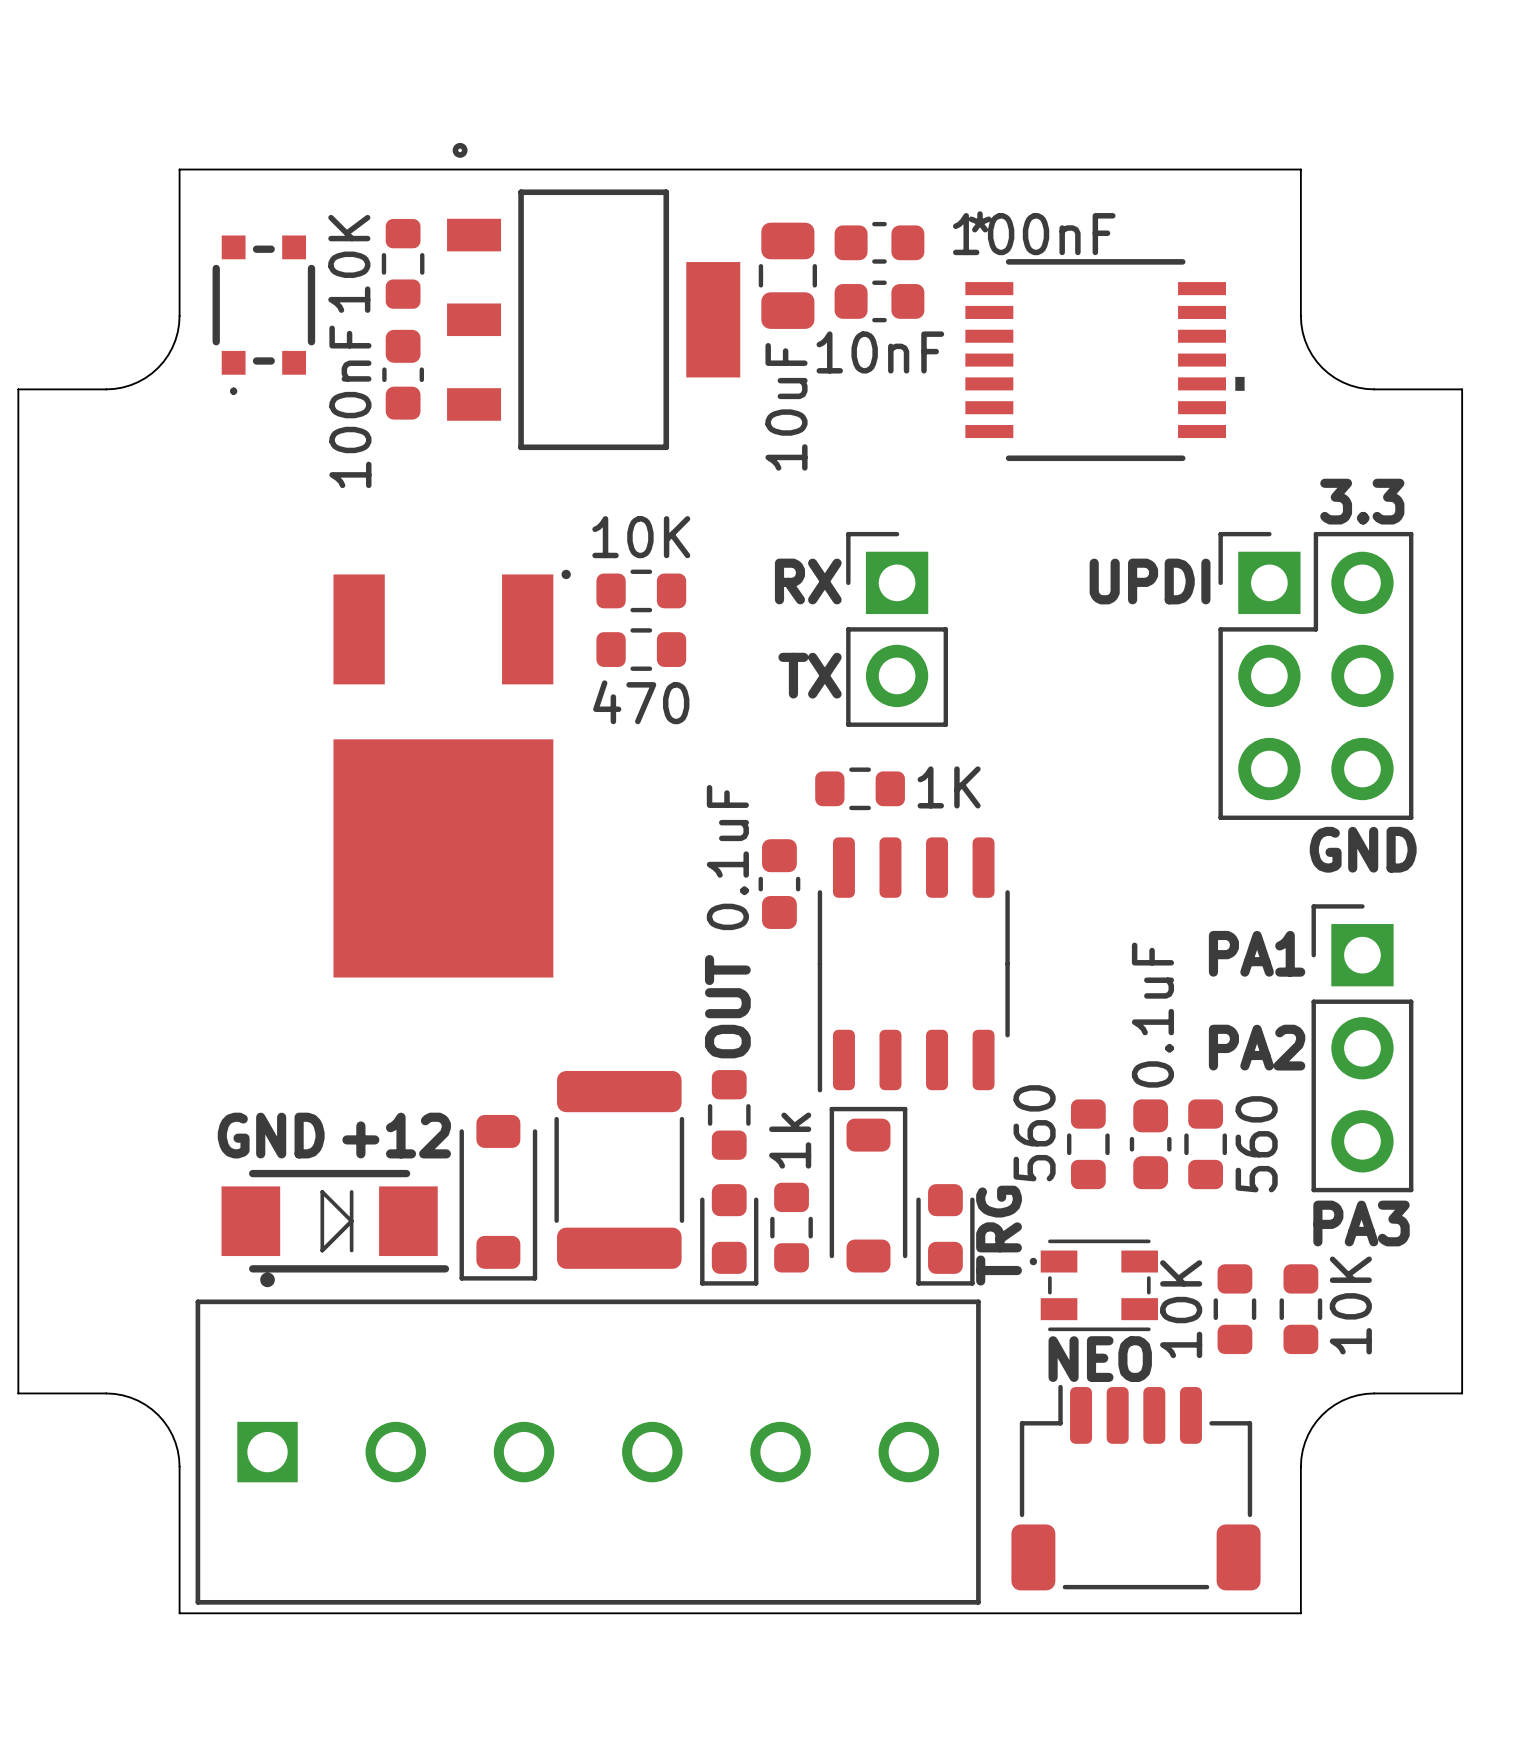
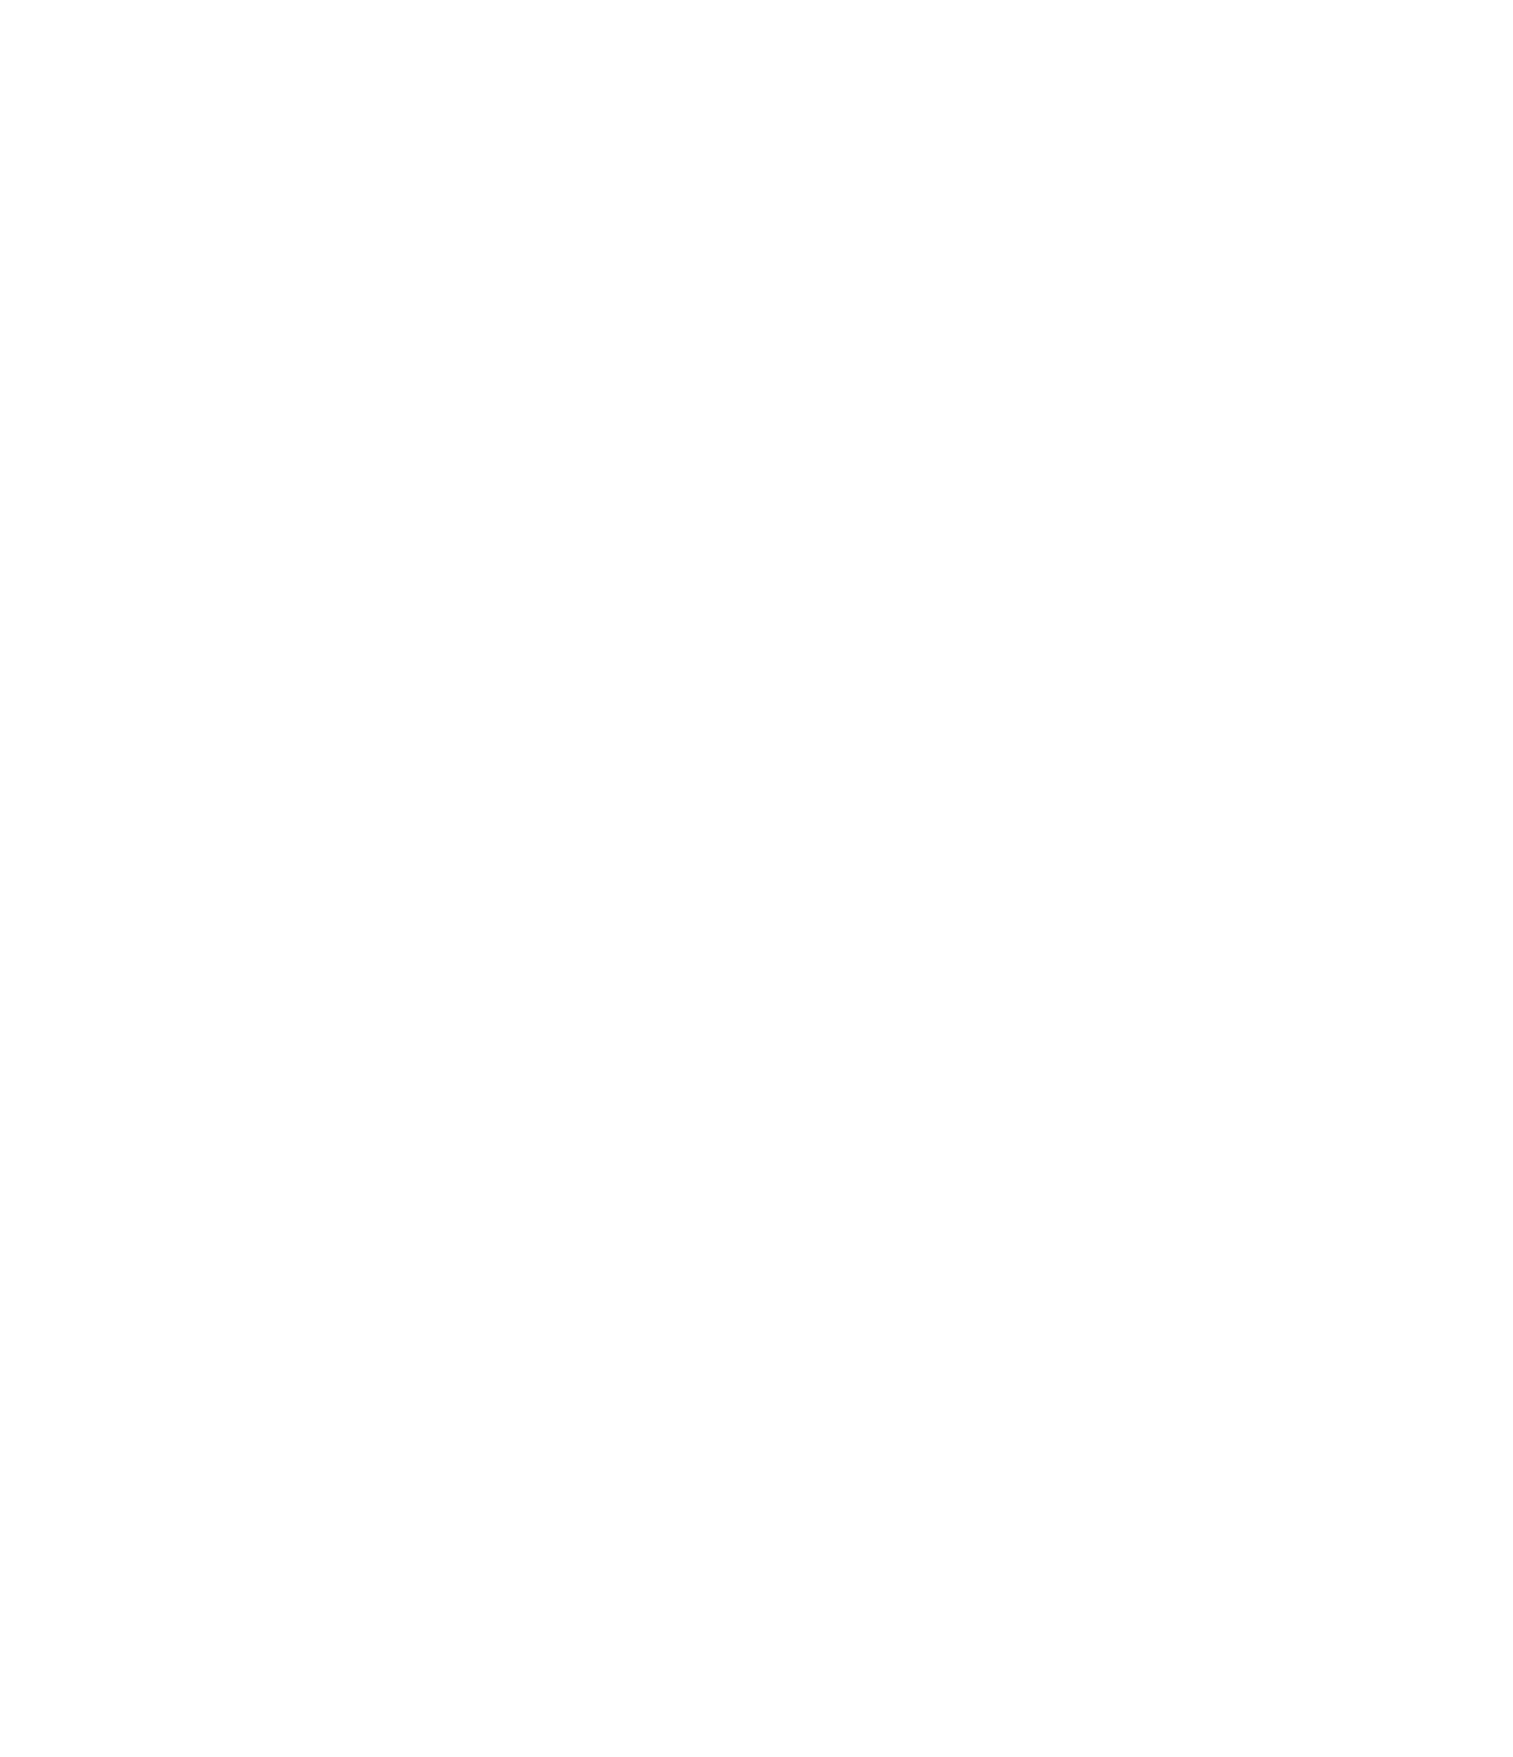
board edge: (179, 169) (1300, 169) (1301, 324) (1308, 347) (1316, 361) (1335, 378) (1357, 387) (1374, 389) (1462, 389) (1462, 1393) (1374, 1393) (1357, 1395) (1335, 1404) (1316, 1421) (1308, 1434) (1301, 1458) (1300, 1613) (179, 1613) (179, 1458) (175, 1442) (163, 1421) (145, 1404) (122, 1395) (106, 1393) (18, 1393) (18, 389) (106, 389) (122, 387) (145, 378) (163, 361) (175, 340) (179, 324) (179, 169) -> none
part: 100nF (879, 242) -> none
part: 10K (403, 263) -> none
part: 10uF (787, 275) -> none
part: (593, 296) -> none
part: 10nF (879, 301) -> none
part: (263, 315) -> none
part: (1104, 360) -> none
part: 100nF (403, 374) -> none
text: 3.3 (1362, 501) -> none
text: RX (808, 581) -> none
text: UPDI (1150, 581) -> none
part: 10K (641, 590) -> none
part: (897, 629) -> none
part: 470 (641, 649) -> none
text: TX (810, 675) -> none
part: (1315, 675) -> none
part: (452, 773) -> none
part: 1K (860, 788) -> none
text: GND (1363, 849) -> none
part: 0.1uF (779, 884) -> none
text: PA1 (1257, 953) -> none
part: (913, 964) -> none
text: OUT (727, 1006) -> none
text: PA2 (1257, 1047) -> none
part: (1362, 1048) -> none
part: (729, 1114) -> none
text: GND (271, 1135) -> none
text: +12 (396, 1135) -> none
part: 560 (1088, 1144) -> none
part: 0.1uF (1150, 1144) -> none
part: 560 (1205, 1144) -> none
part: (619, 1169) -> none
part: (868, 1189) -> none
part: (498, 1197) -> none
part: (335, 1221) -> none
text: PA3 (1361, 1223) -> none
part: 1k (791, 1227) -> none
part: (729, 1234) -> none
part: (945, 1234) -> none
text: TRG (999, 1235) -> none
part: (1093, 1285) -> none
part: 10K (1234, 1309) -> none
part: 10K (1300, 1309) -> none
text: NEO (1100, 1359) -> none
part: (588, 1438) -> none
part: (1135, 1487) -> none

